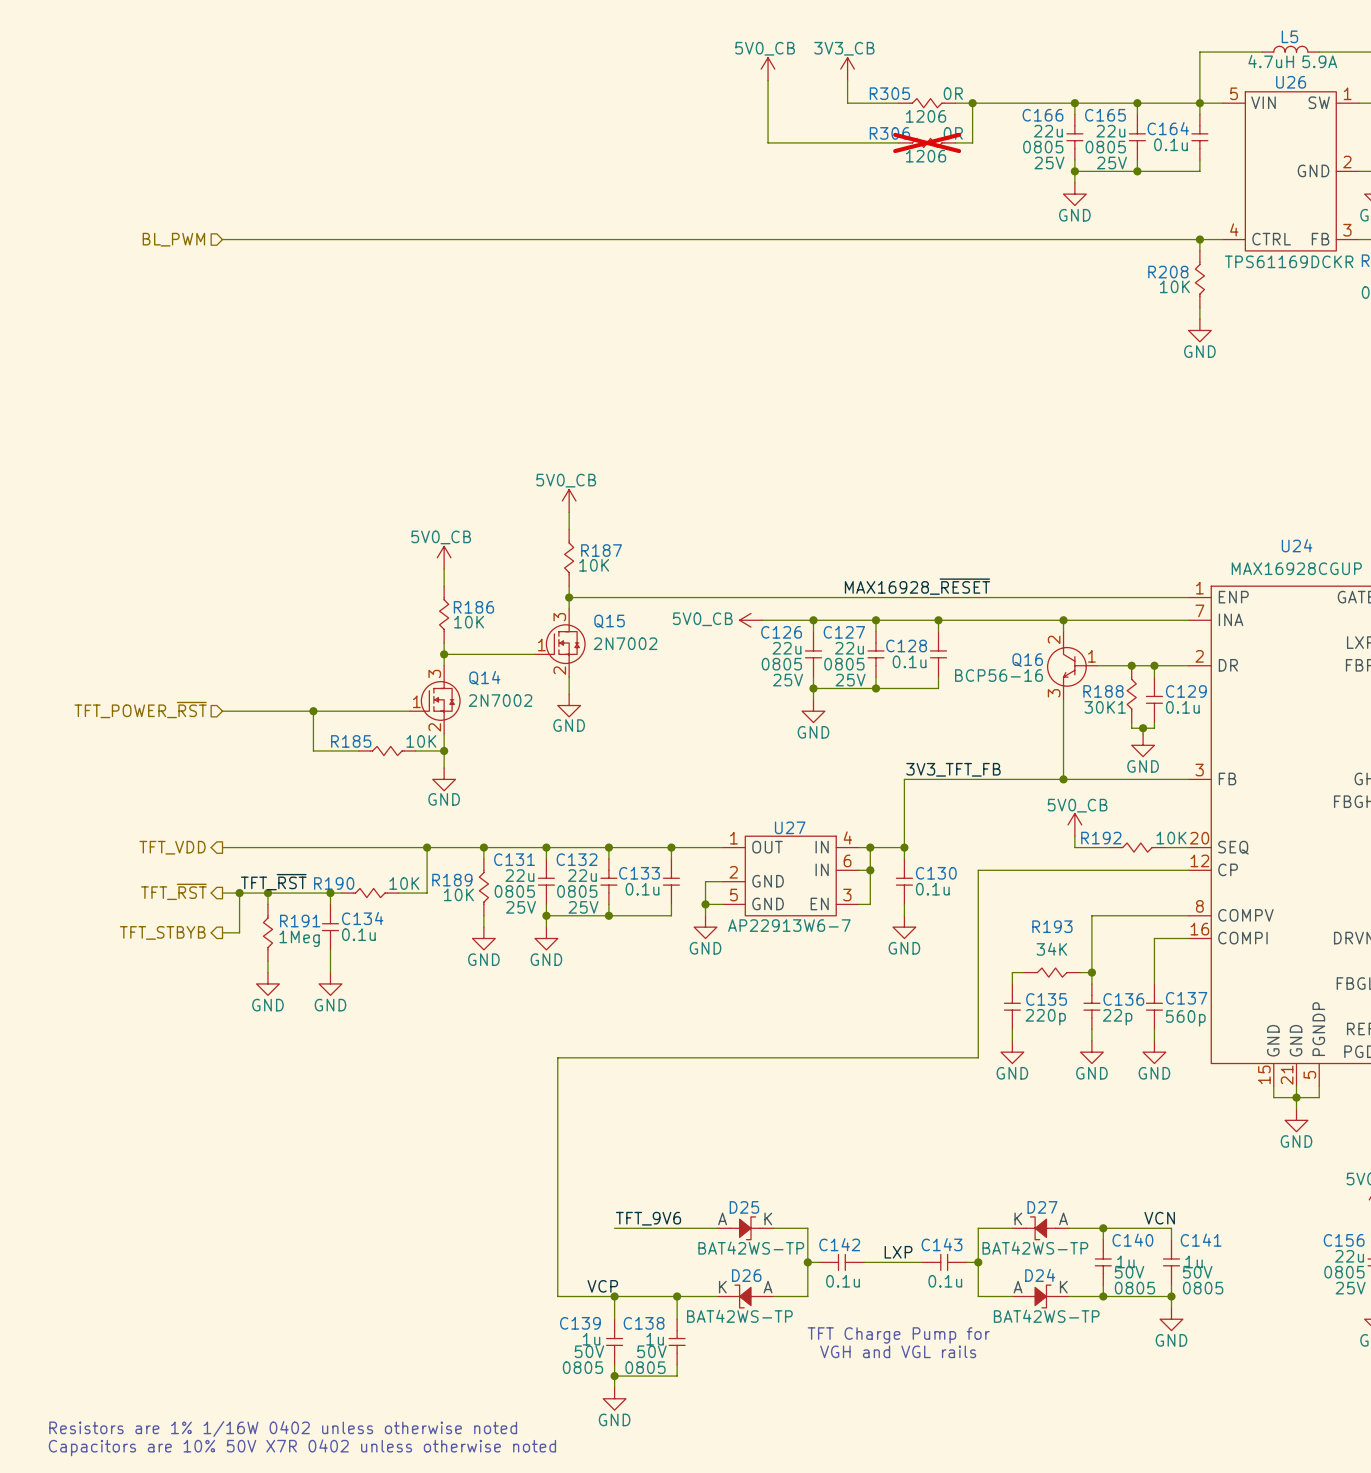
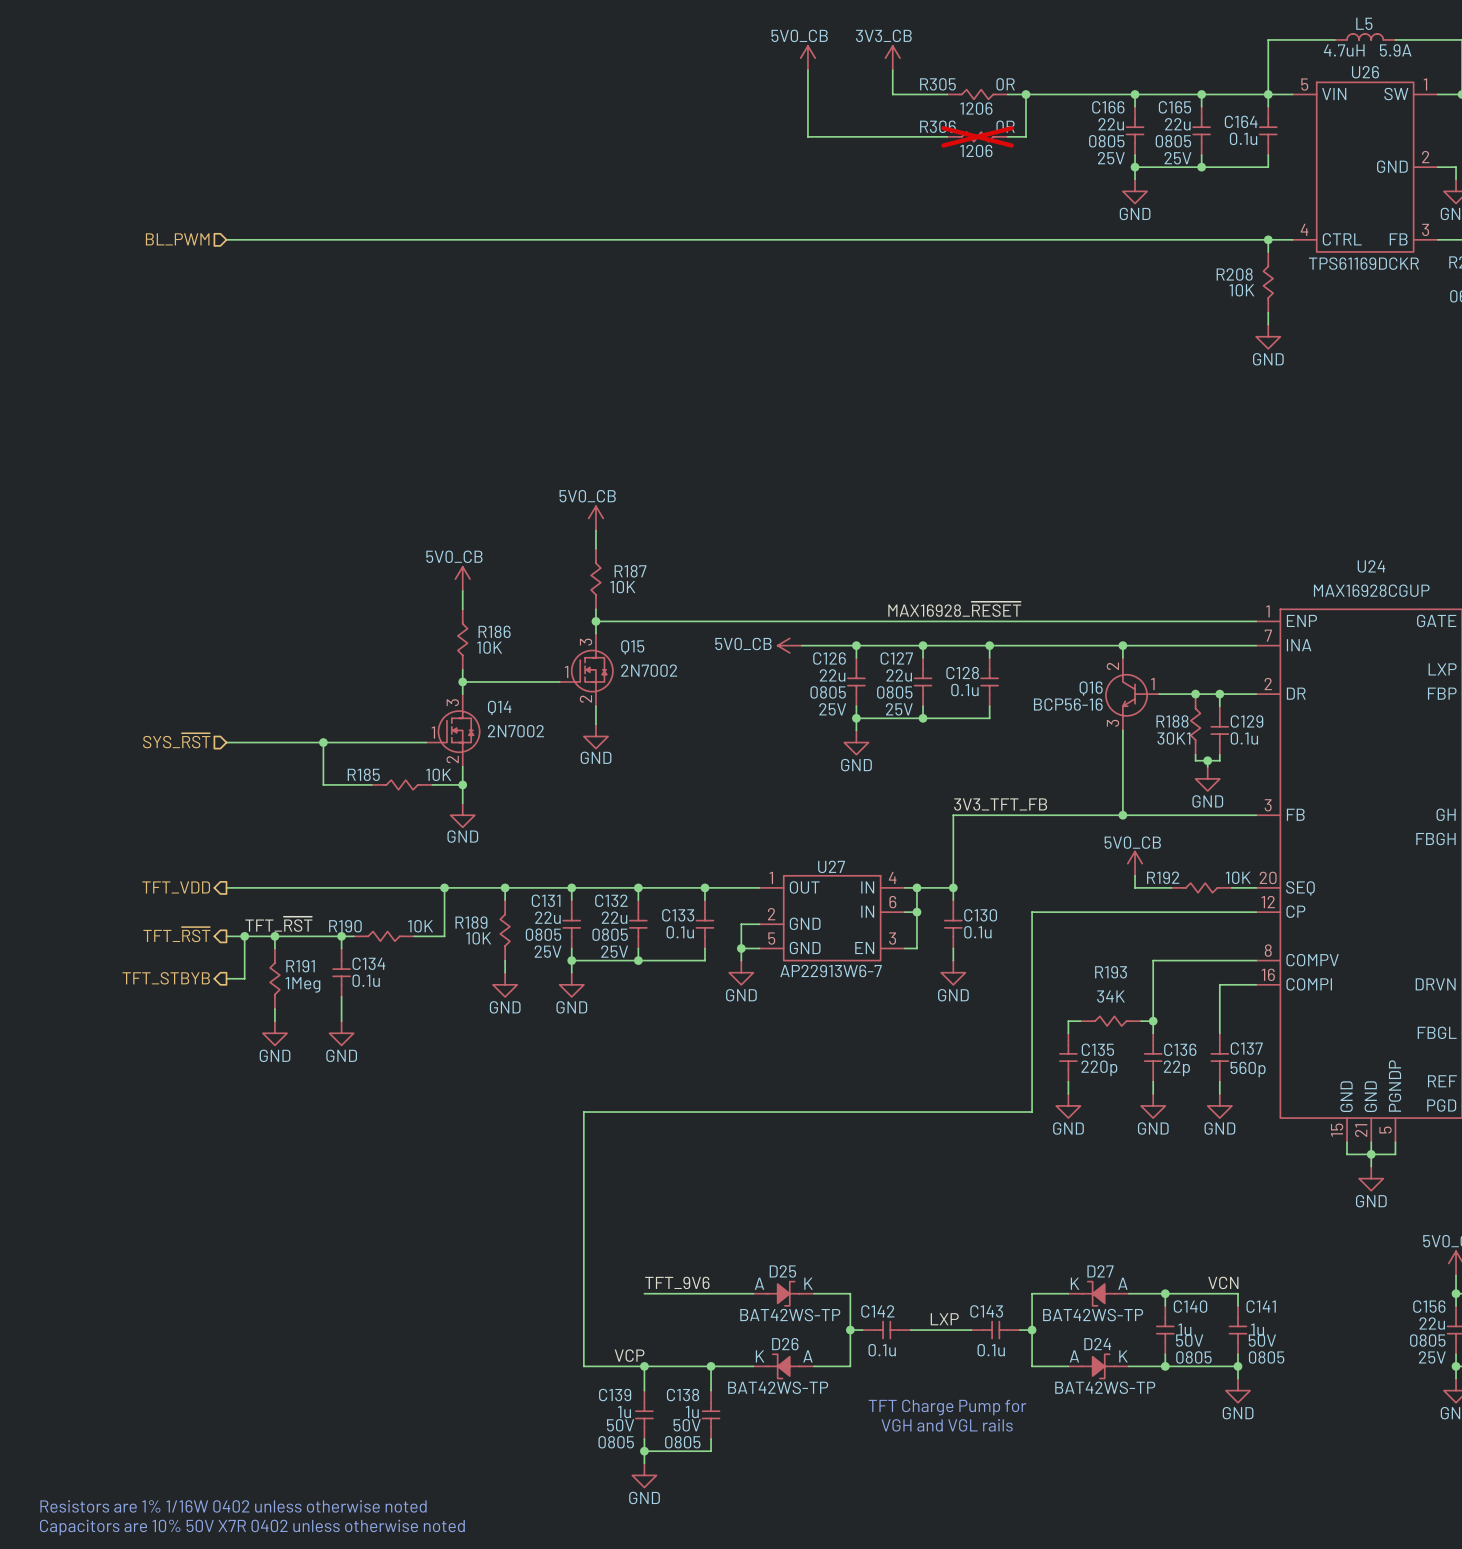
hierarchical label: TFT_POWER_~{RST} (140, 710) -> SYS_~{RST} (176, 740)

